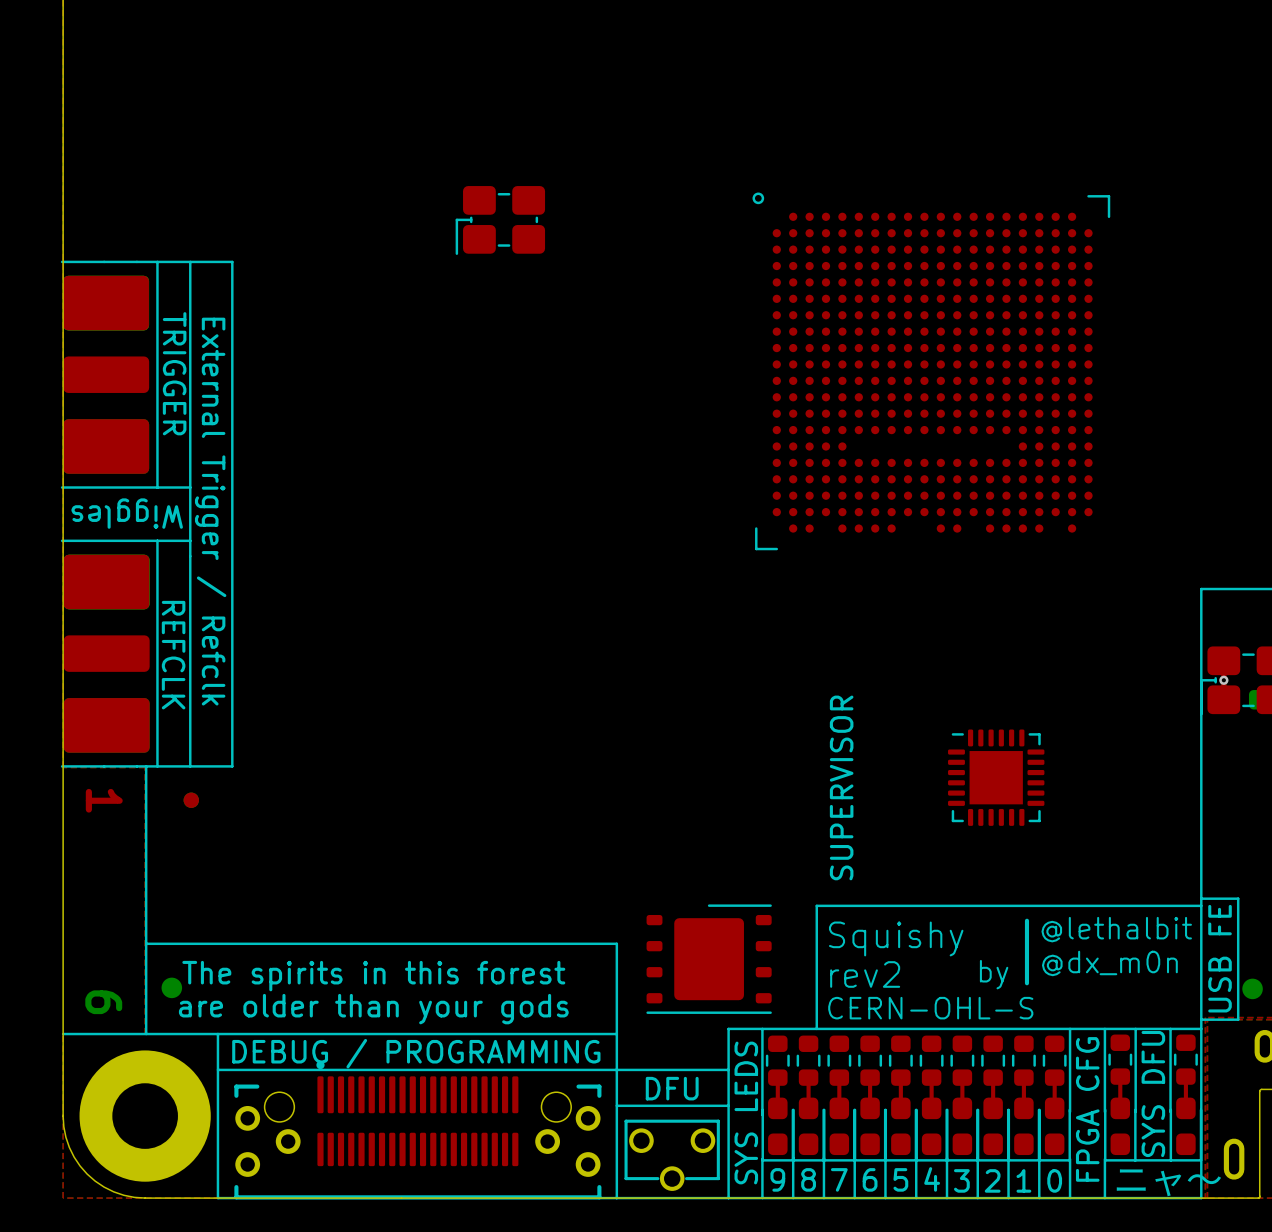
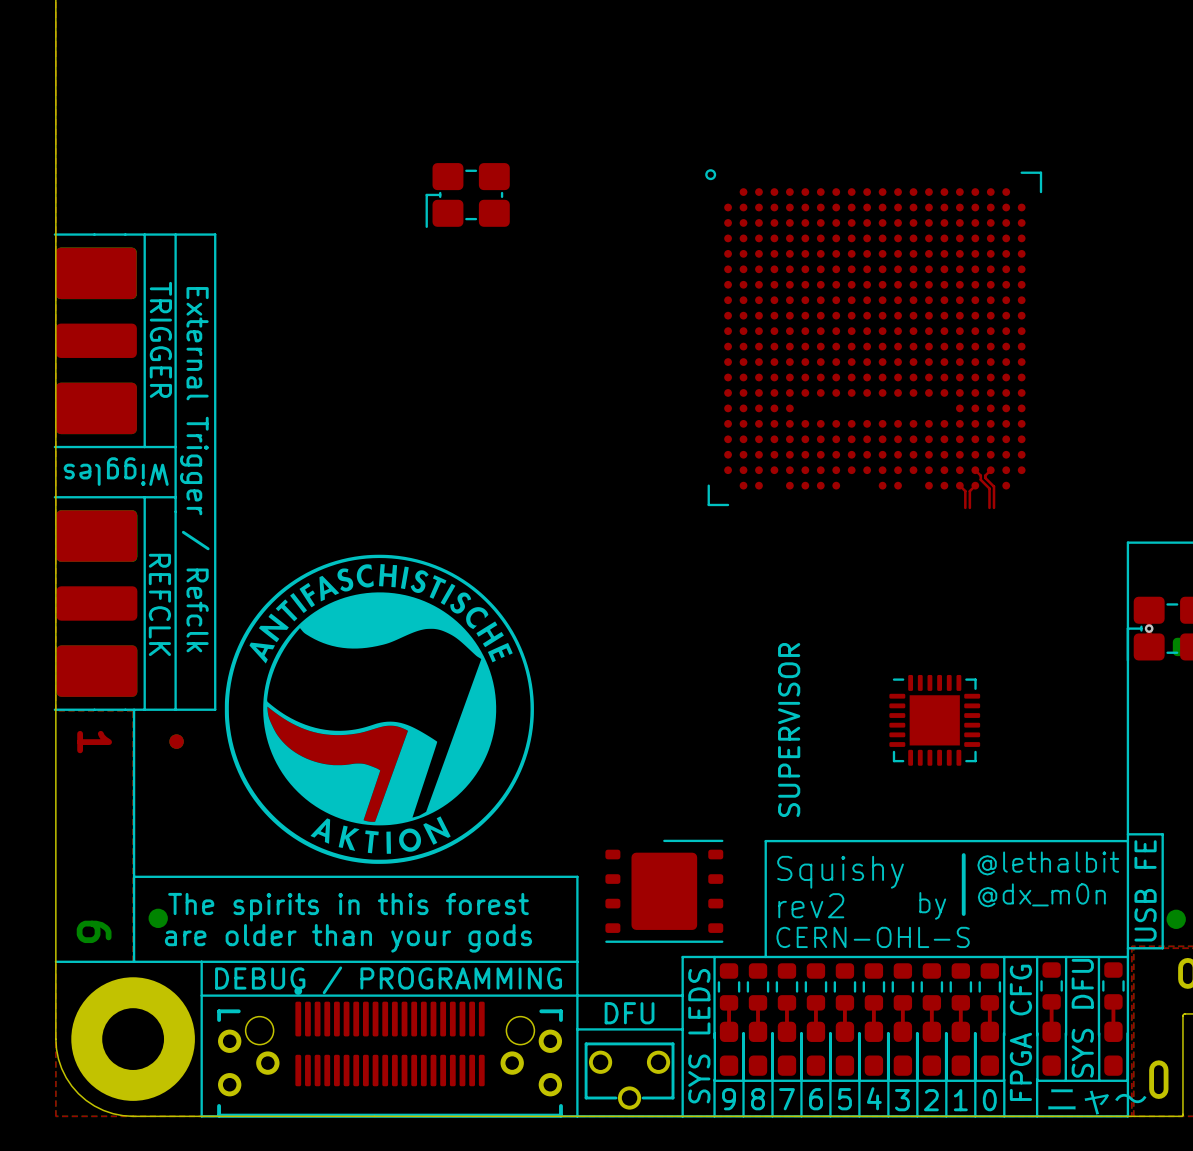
top track: none -> (975, 470) (980, 475) (980, 479) (989, 488) (989, 507)
top track: none -> (990, 470) (985, 477) (993, 486) (993, 507)
top track: none -> (959, 485) (965, 491) (965, 507)
top track: none -> (975, 485) (969, 491) (969, 507)
drawing: none -> [224, 554, 534, 864]

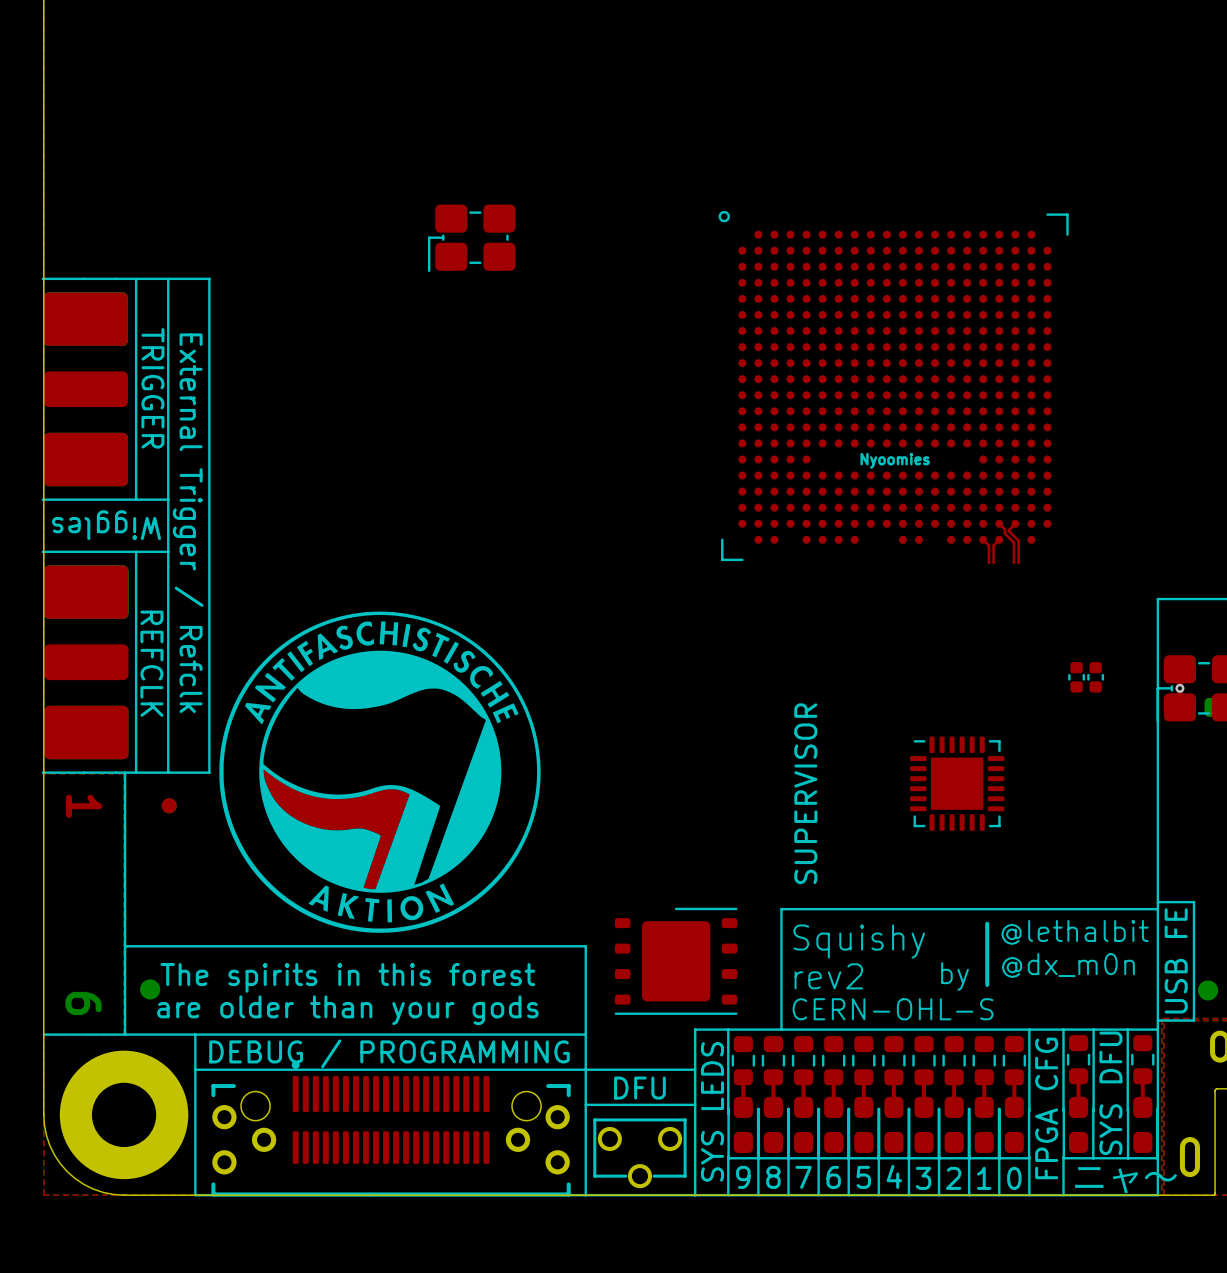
text: none -> Nyoomies (895, 460)
part: none -> (1076, 677)
part: none -> (1095, 677)

